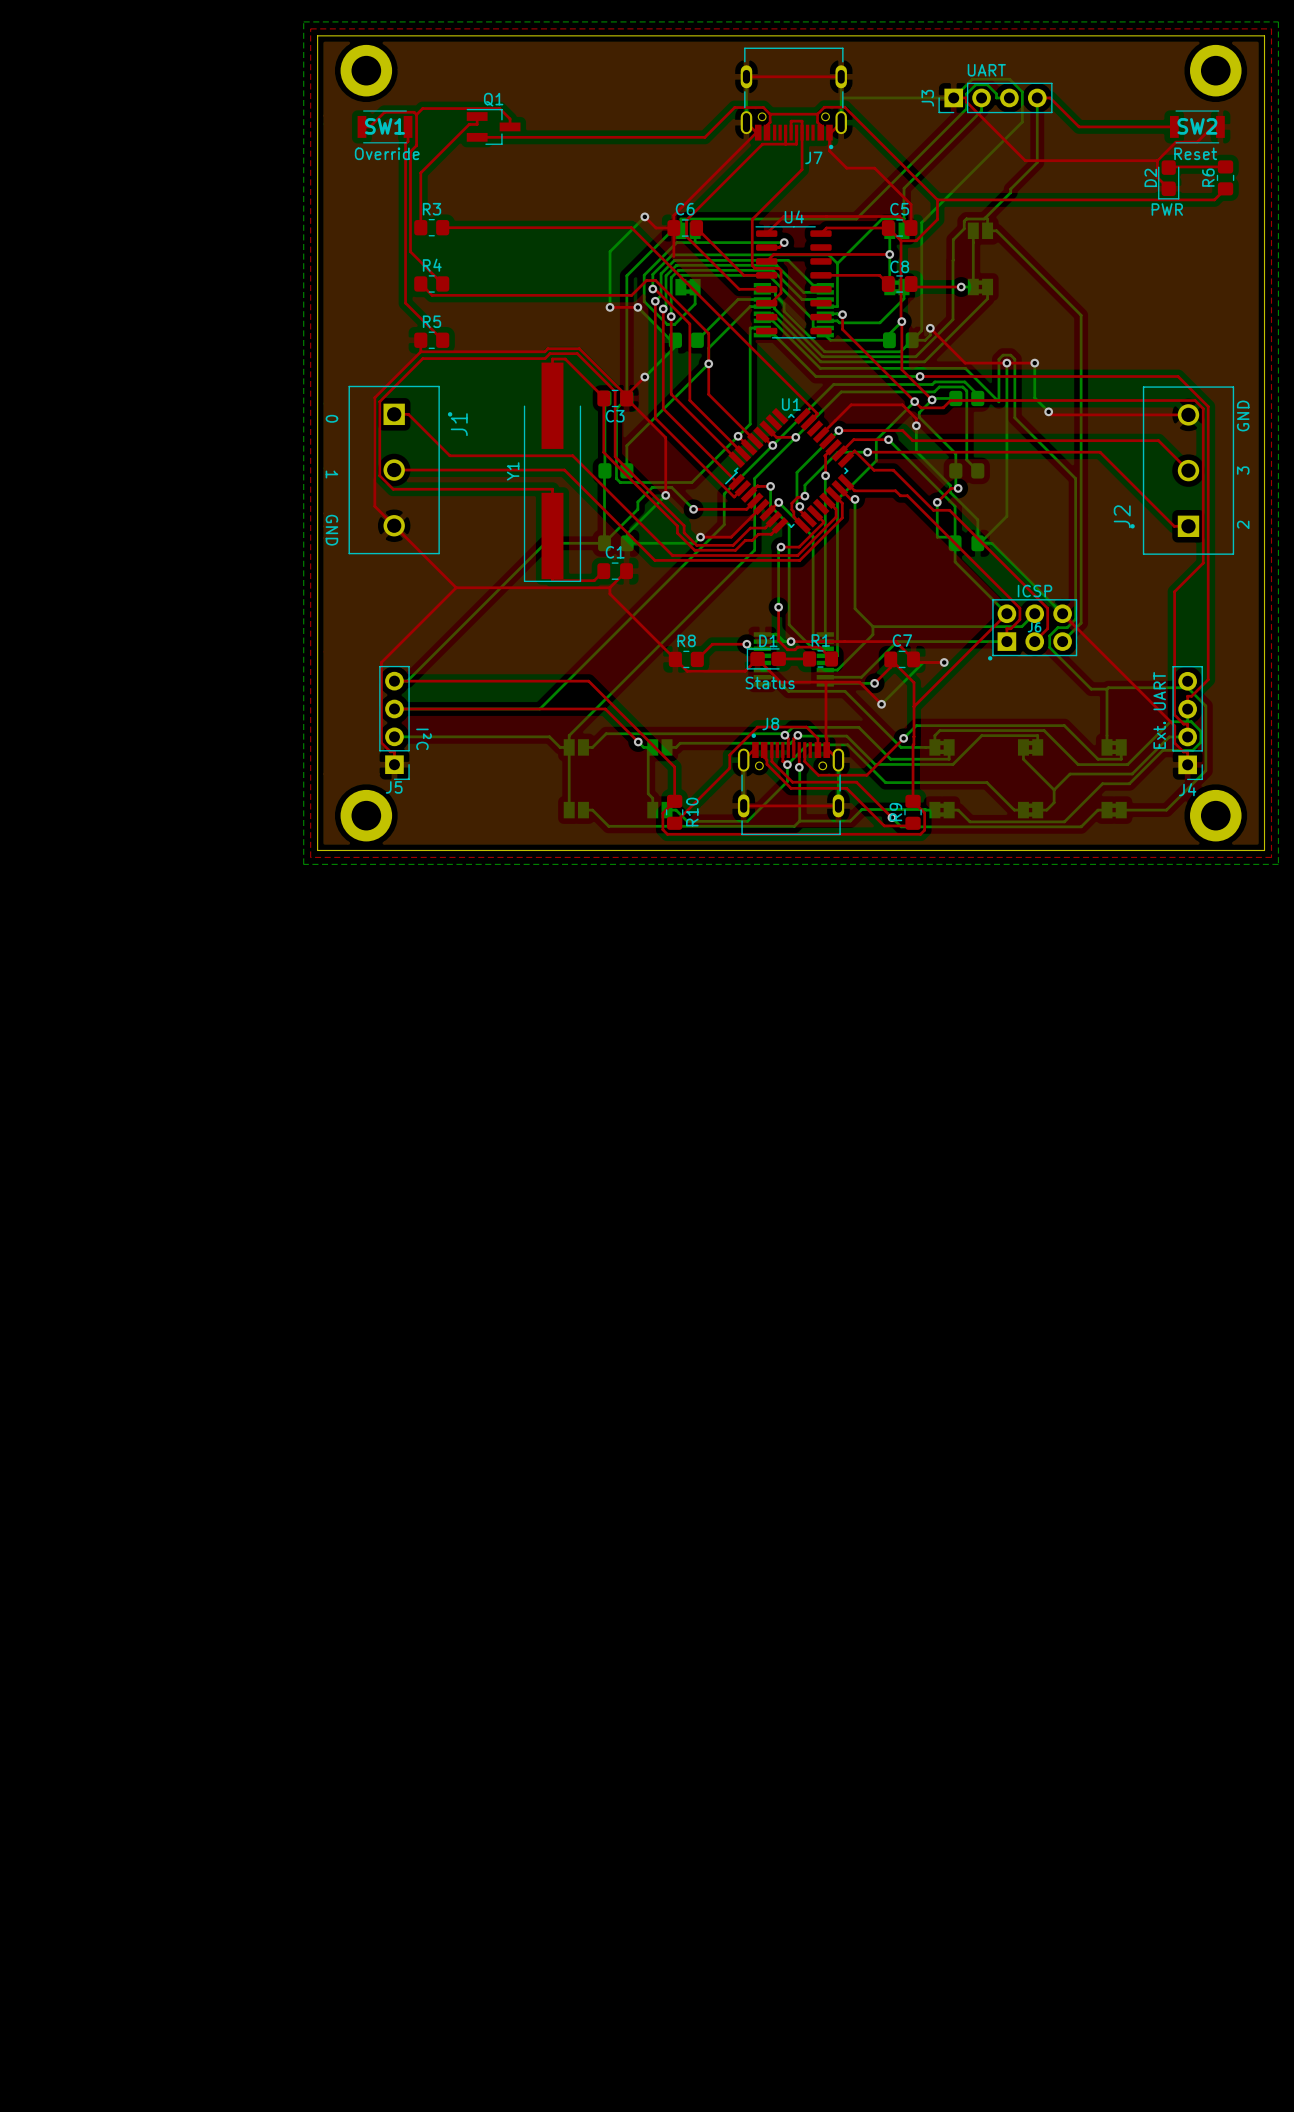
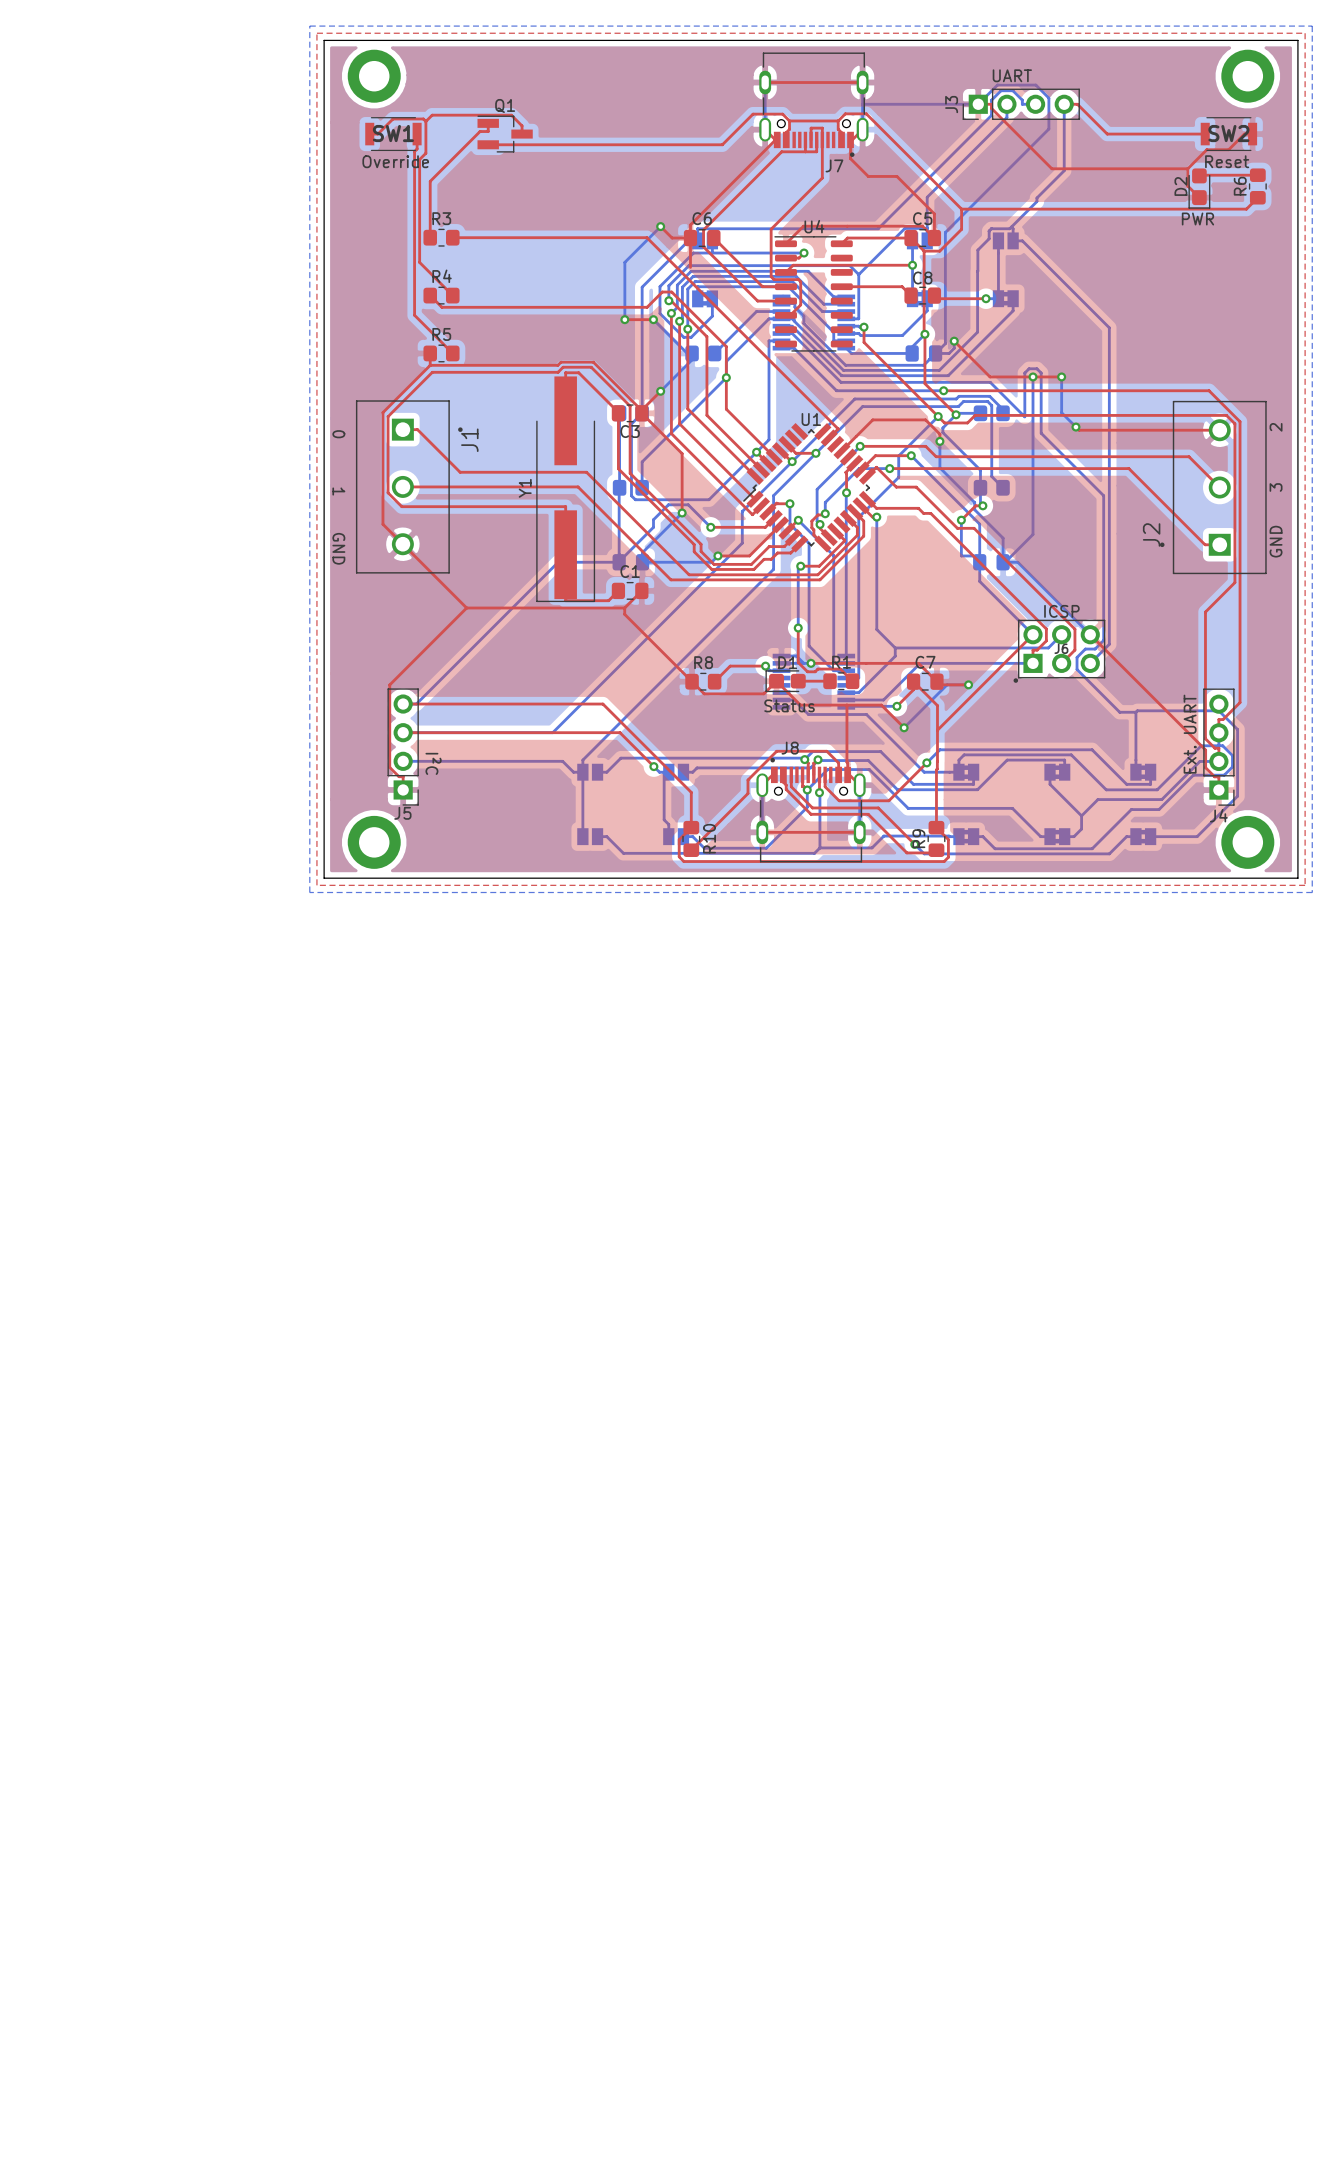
text: GND (1243, 416) -> 2 (1276, 427)
text: 2 (1243, 524) -> GND (1276, 541)

